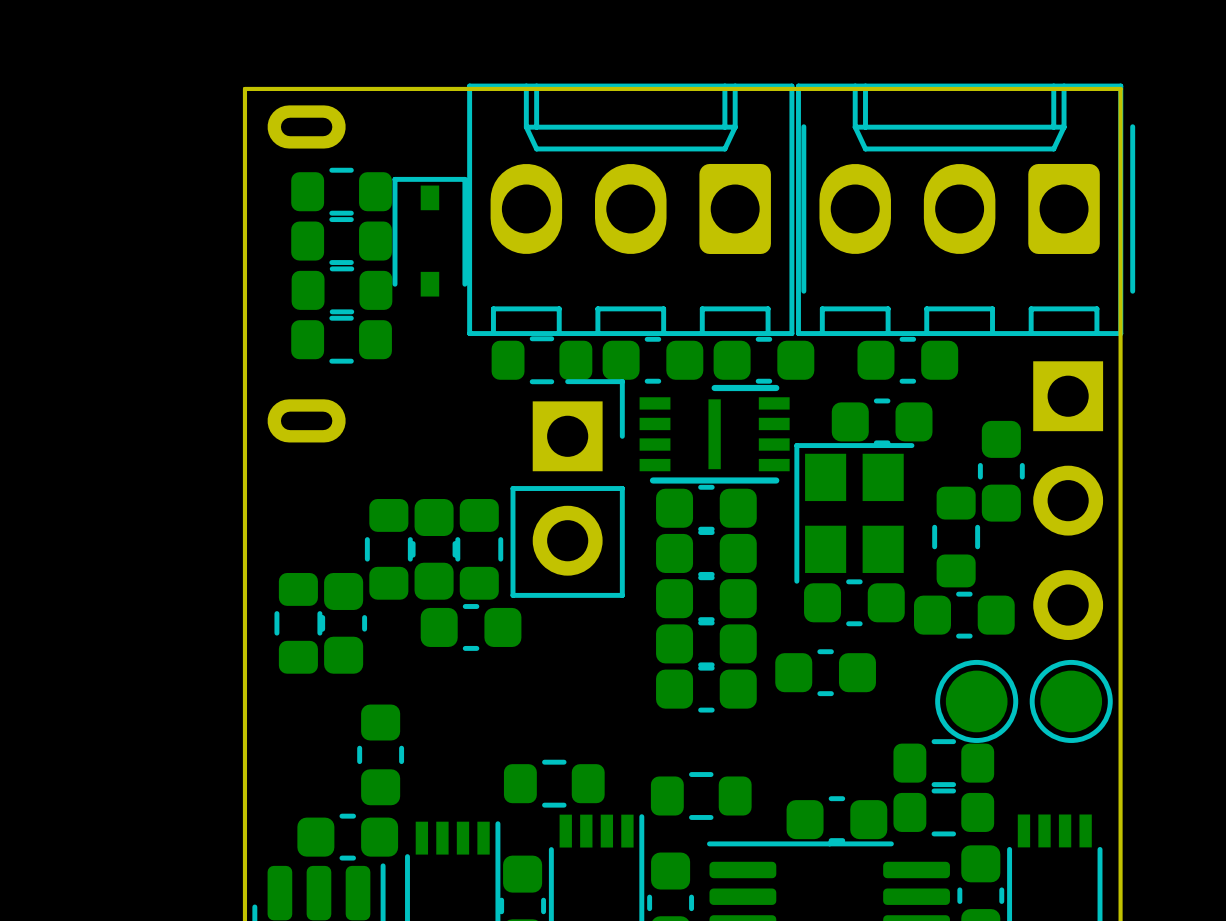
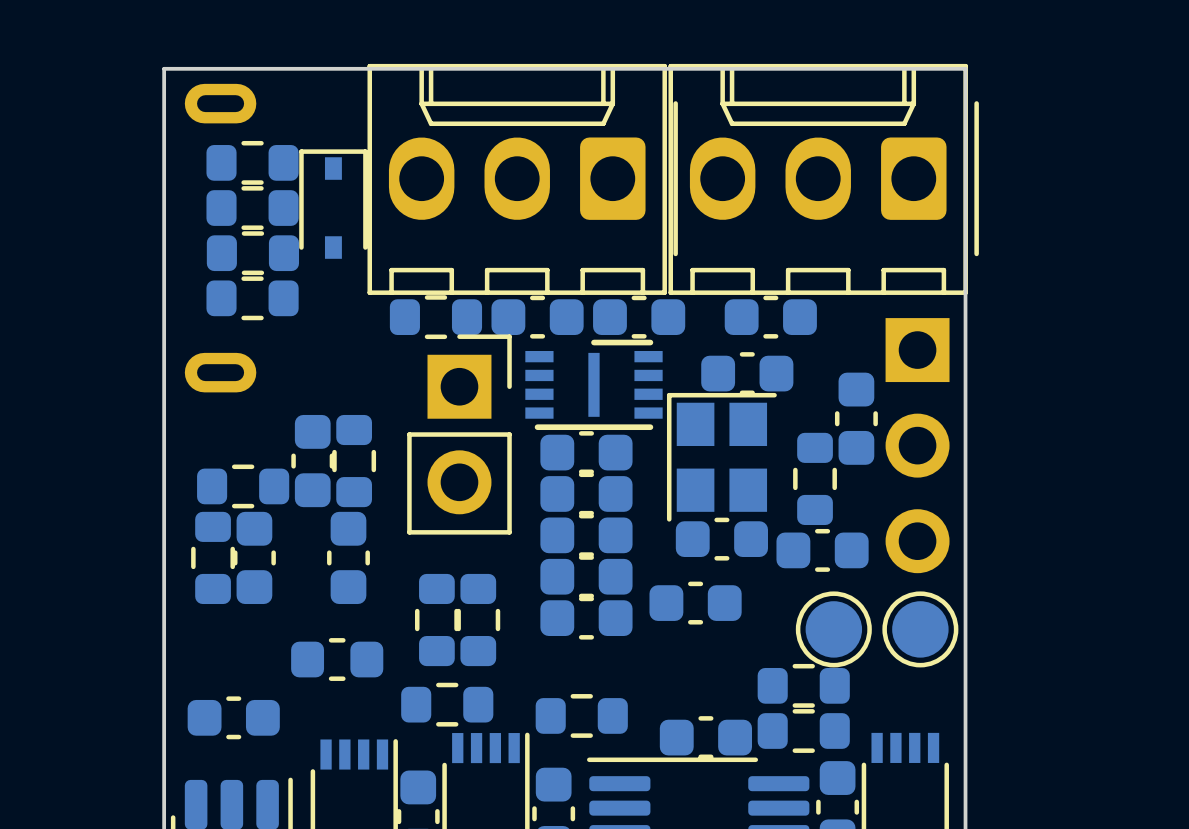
part: none -> (354, 461)
part: none -> (243, 486)
part: (388, 549) -> none
part position: (434, 549) -> (312, 461)
part: (479, 549) -> none
part rotation: 0° (471, 627) -> 90° clockwise (348, 557)
part: none -> (436, 620)
part: none -> (478, 620)
part rotation: 0° (380, 754) -> 90° clockwise (337, 659)
part position: (347, 837) -> (233, 717)

